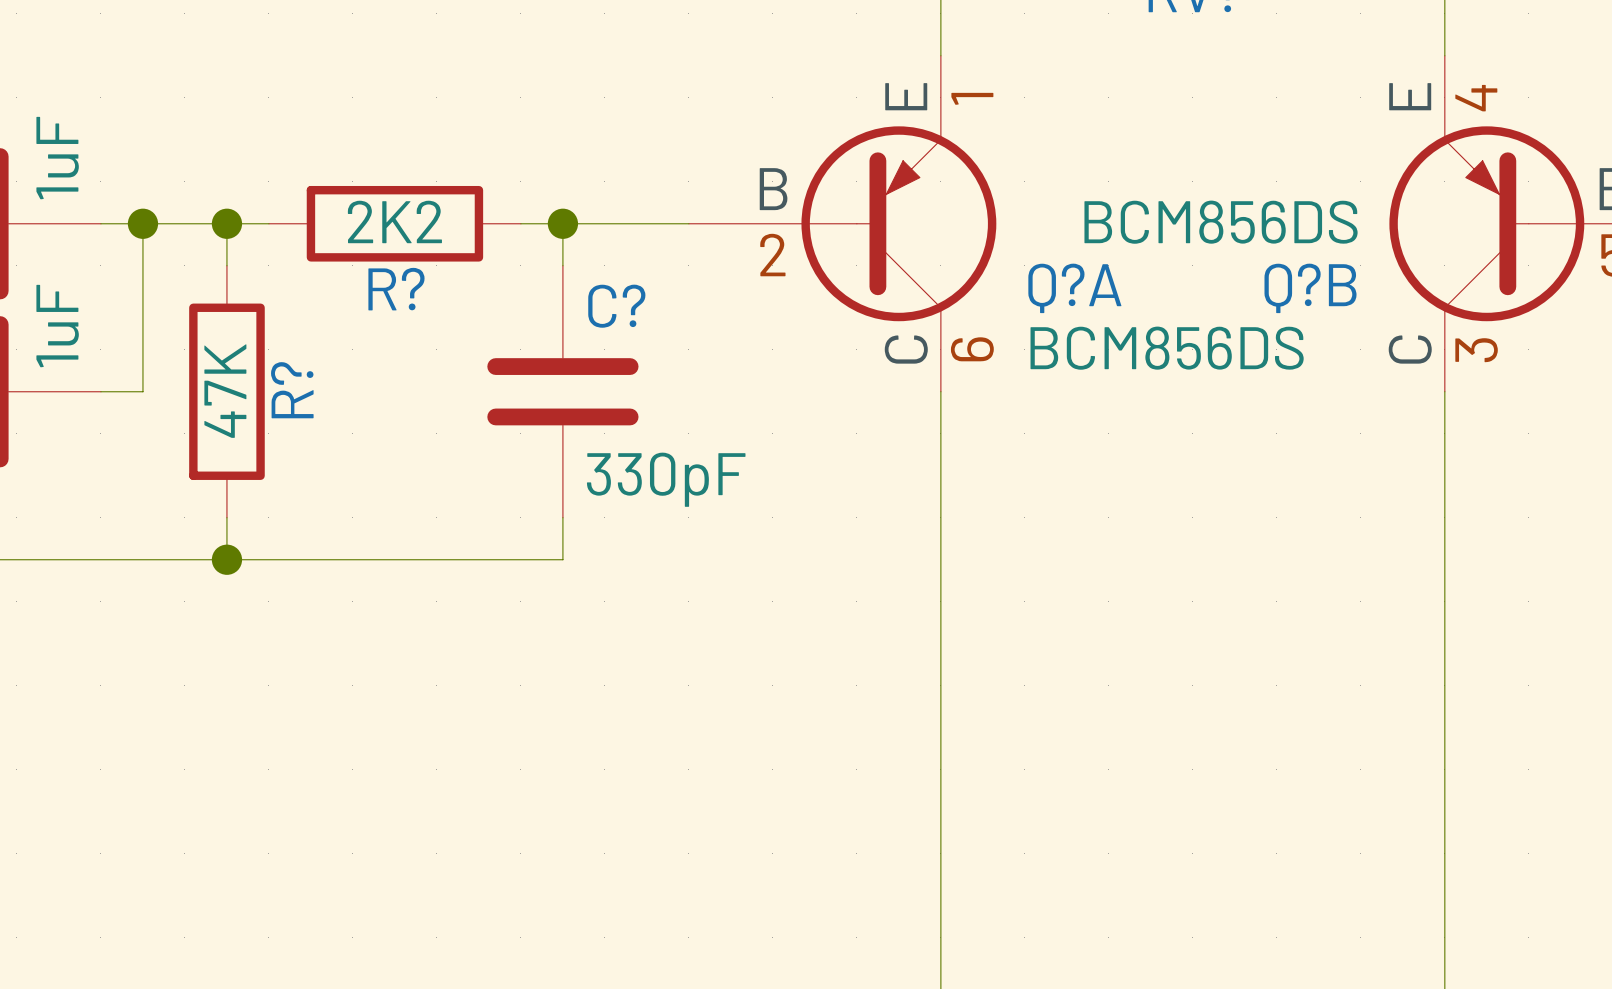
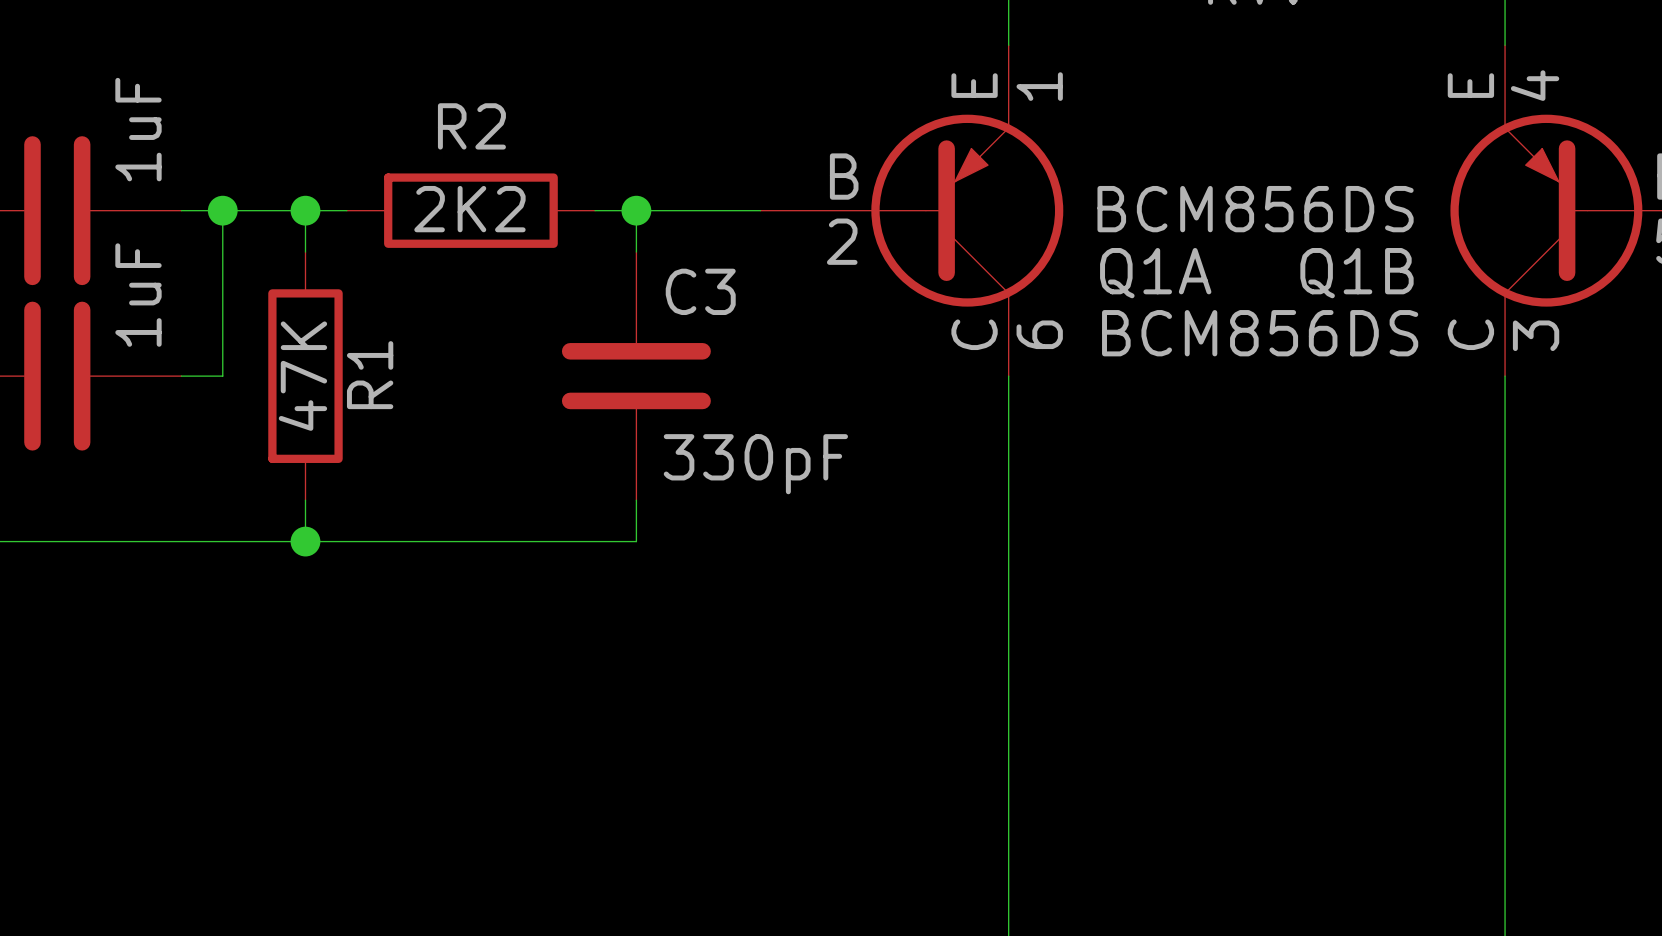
Q?A name: Q?A (1074, 288) -> Q1A (1155, 273)
Q?B name: Q?B (1310, 288) -> Q1B (1357, 273)
R? name: R? (396, 289) -> R2 (471, 126)
C? name: C? (616, 306) -> C3 (700, 291)
R? name: R? (292, 390) -> R1 (370, 375)

